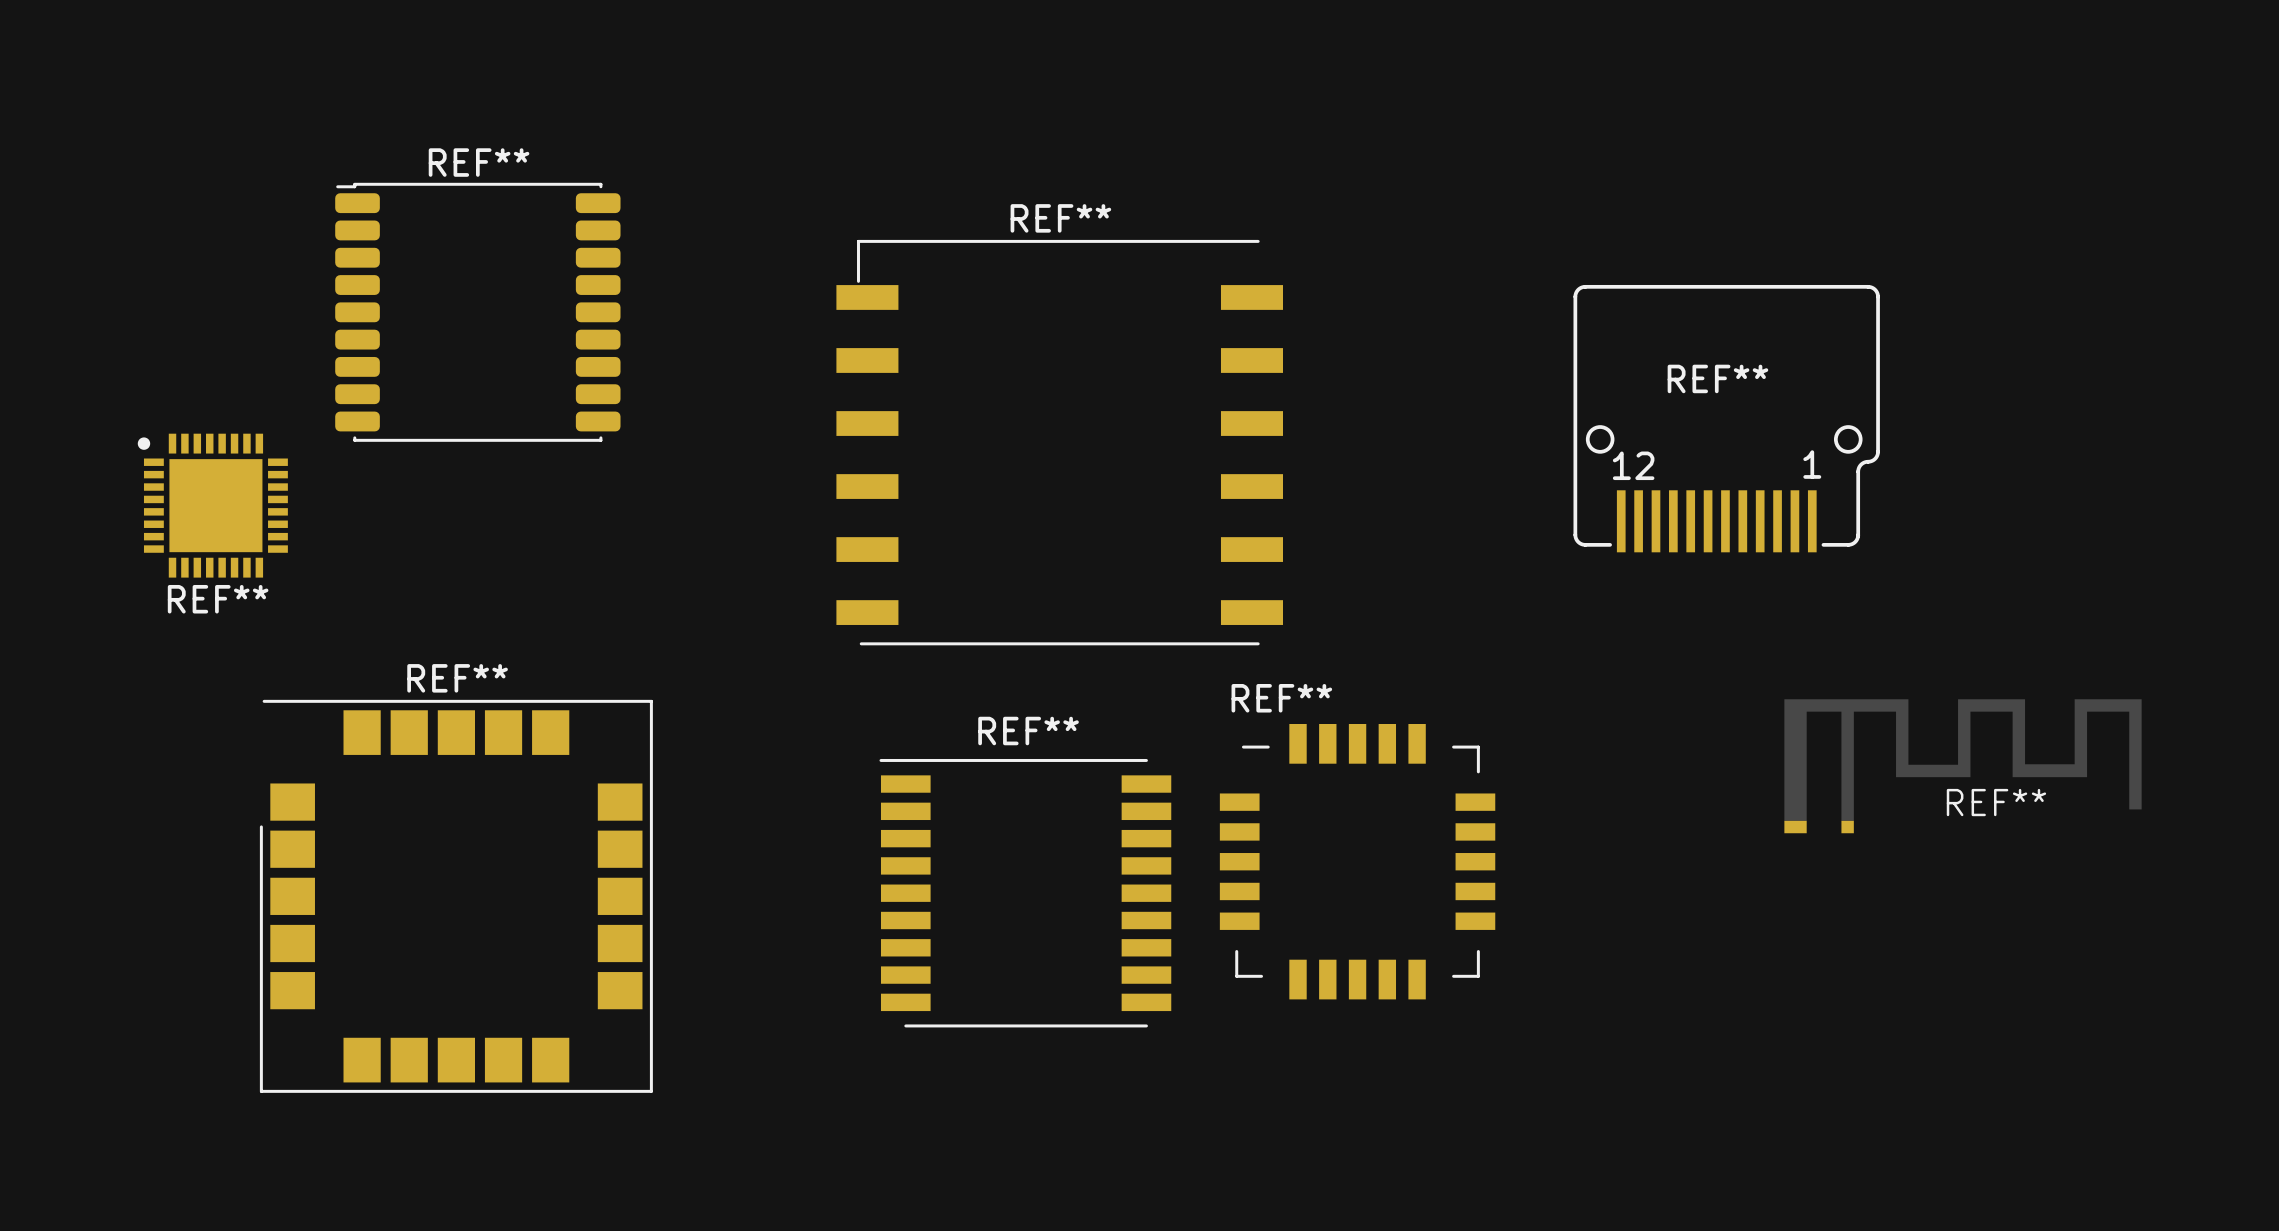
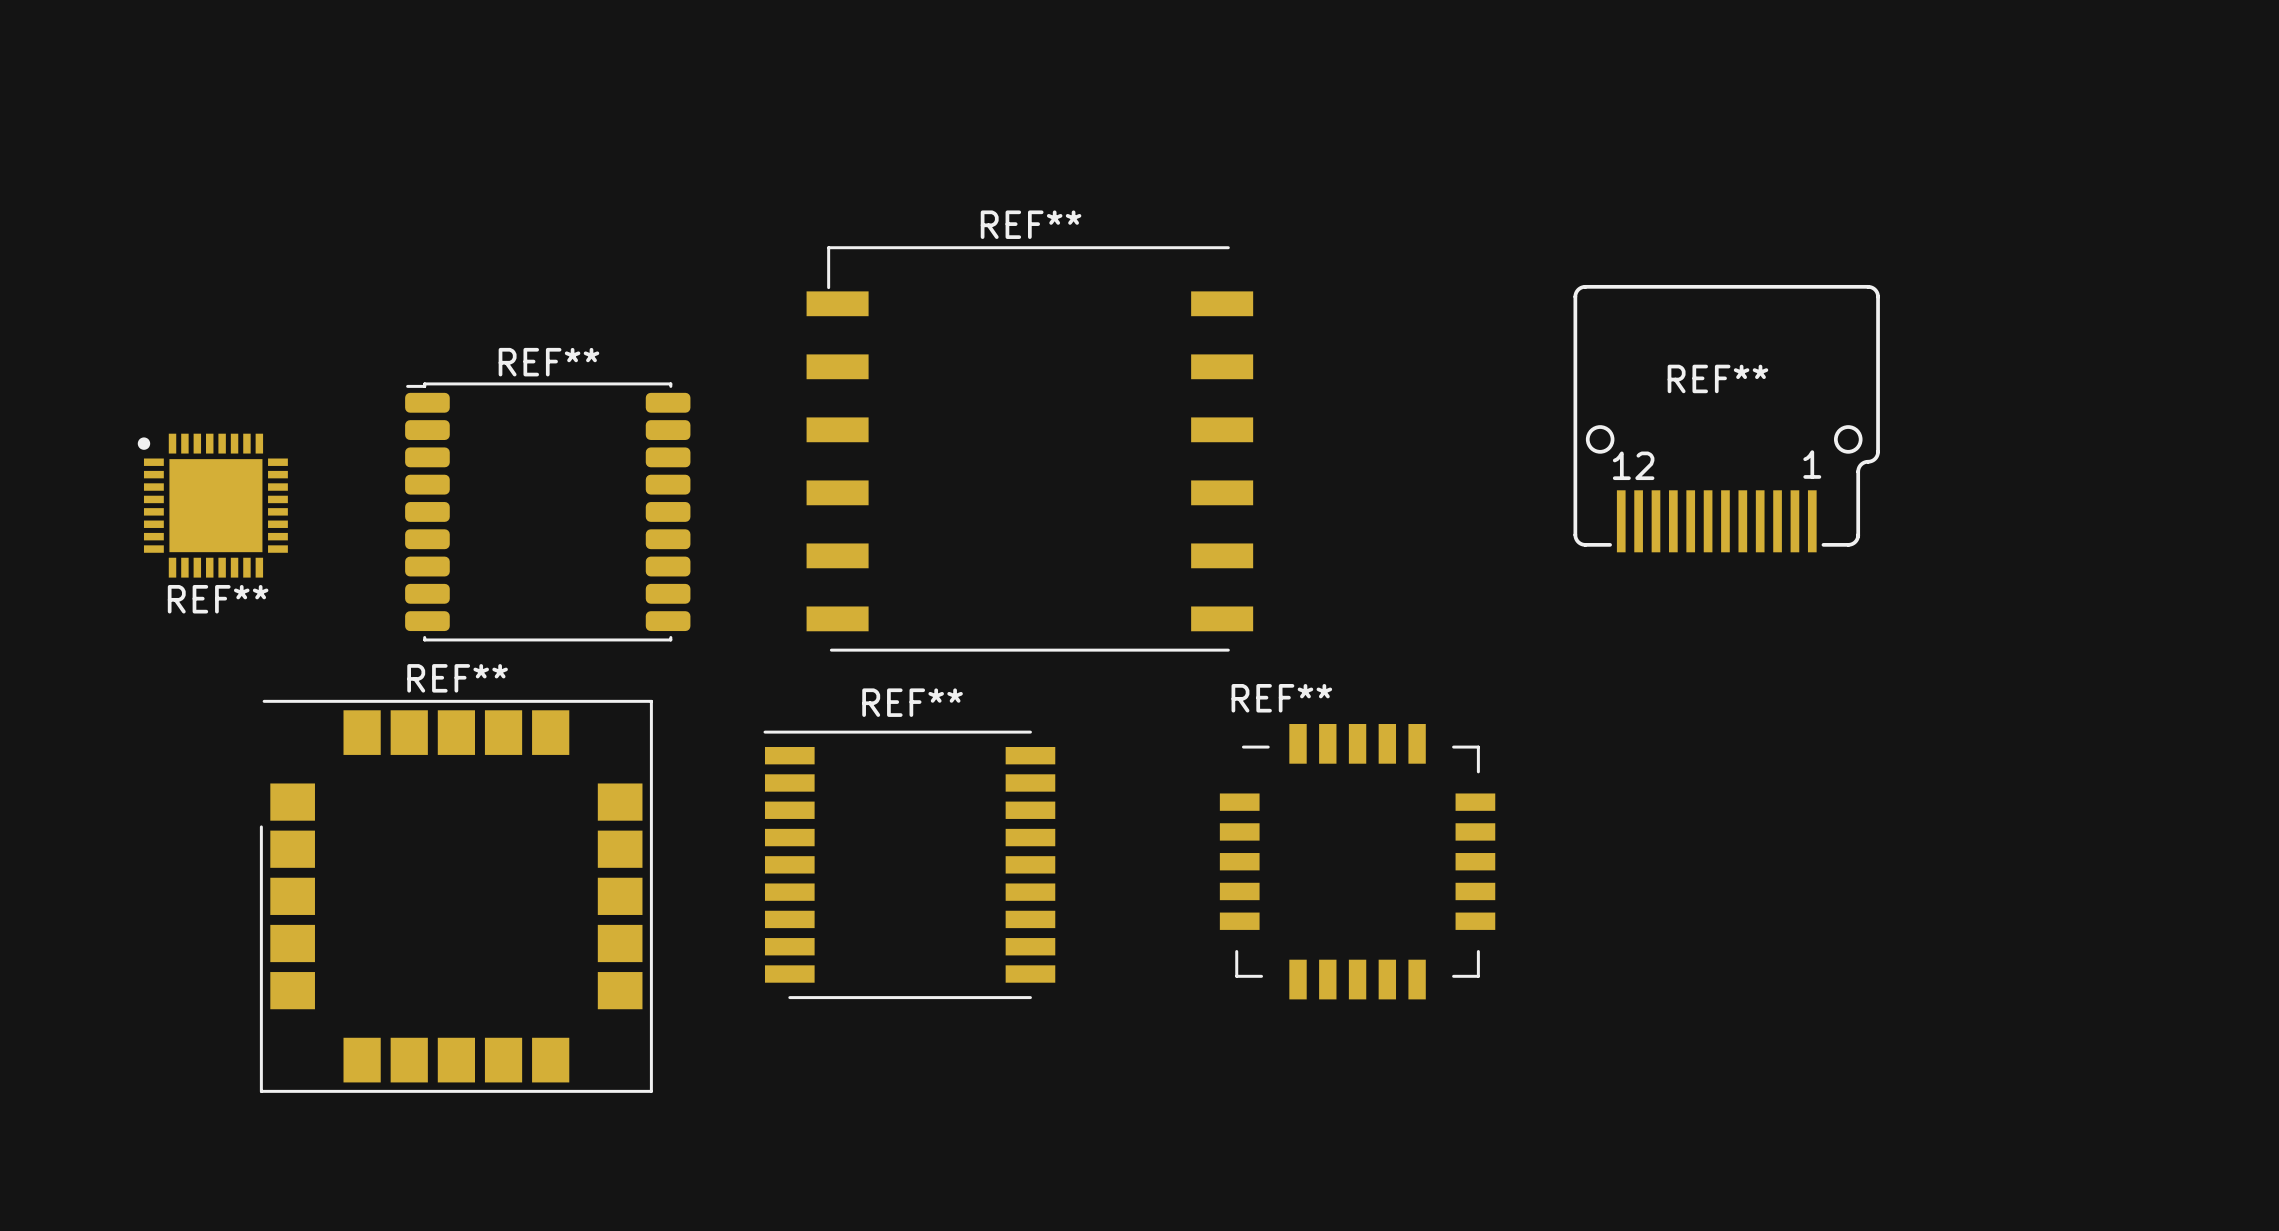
REF** position: (477, 312) -> (547, 511)
REF** position: (1059, 442) -> (1029, 448)
REF**: (1963, 766) -> none
REF** position: (1025, 893) -> (909, 864)

